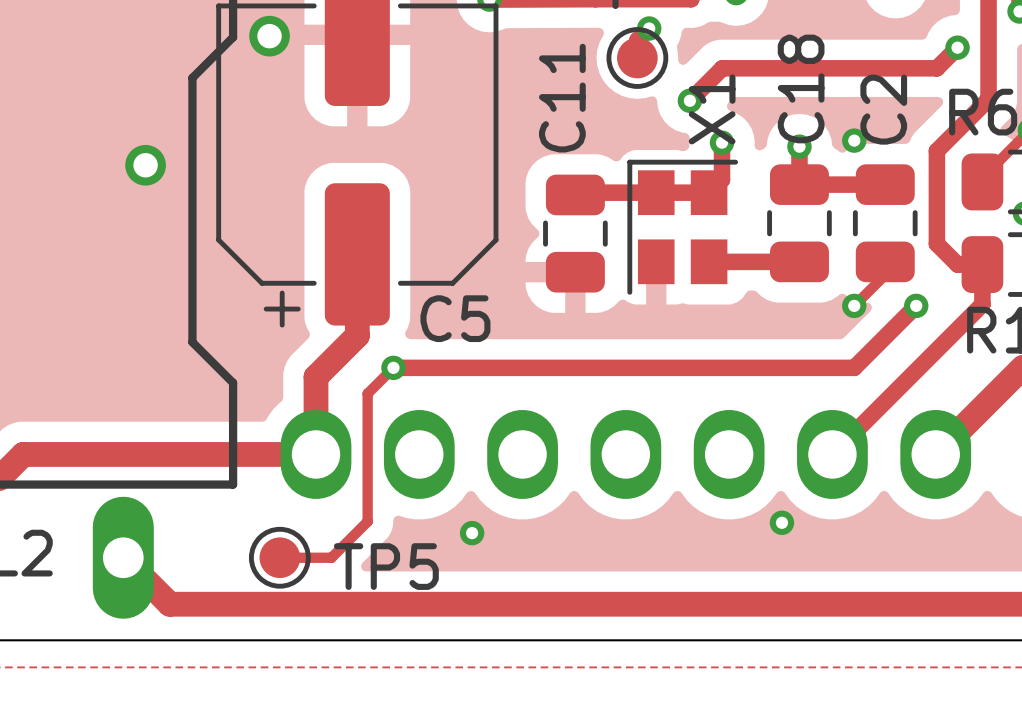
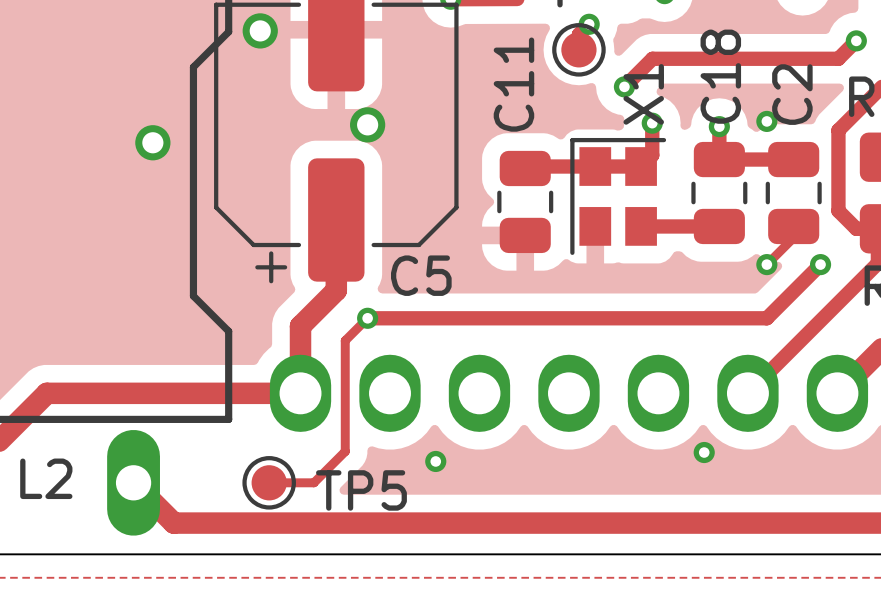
via: none -> (367, 124)

